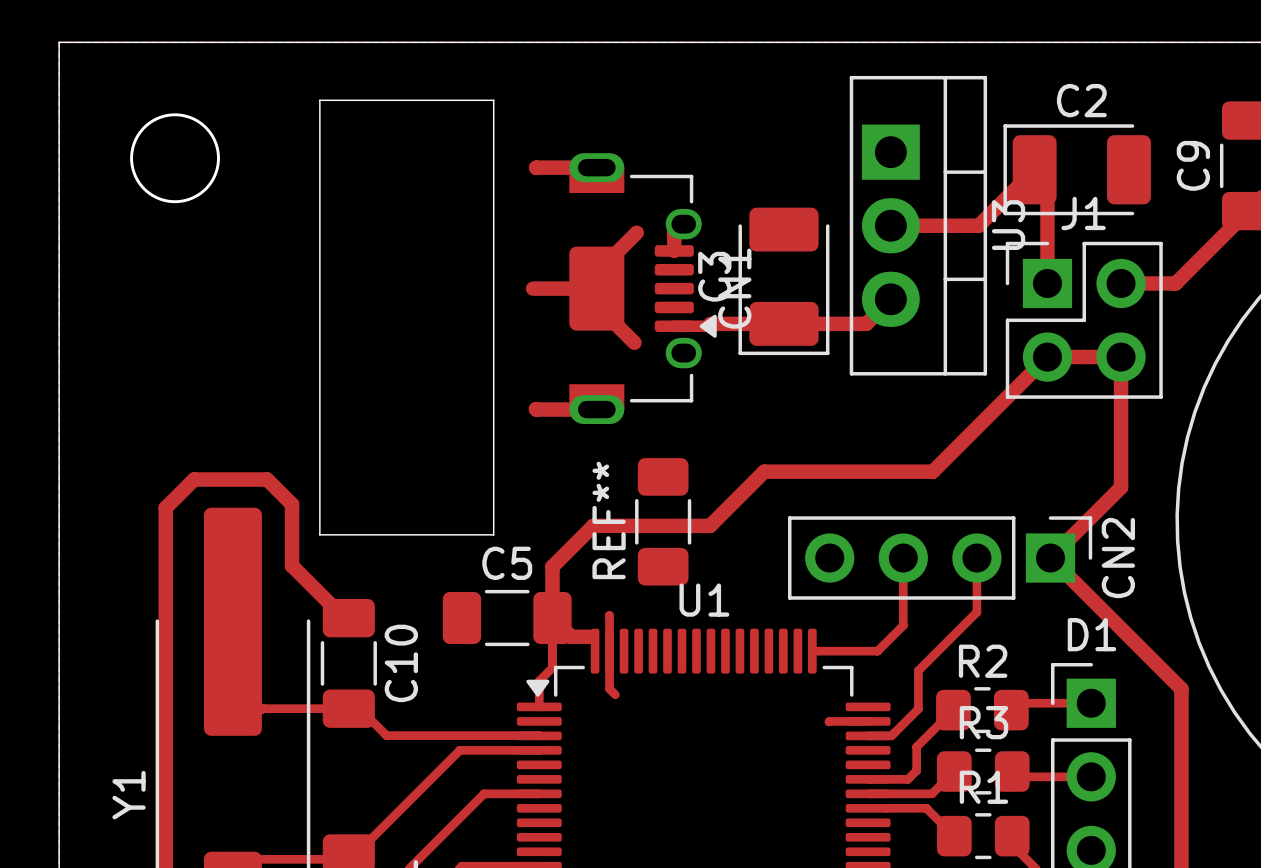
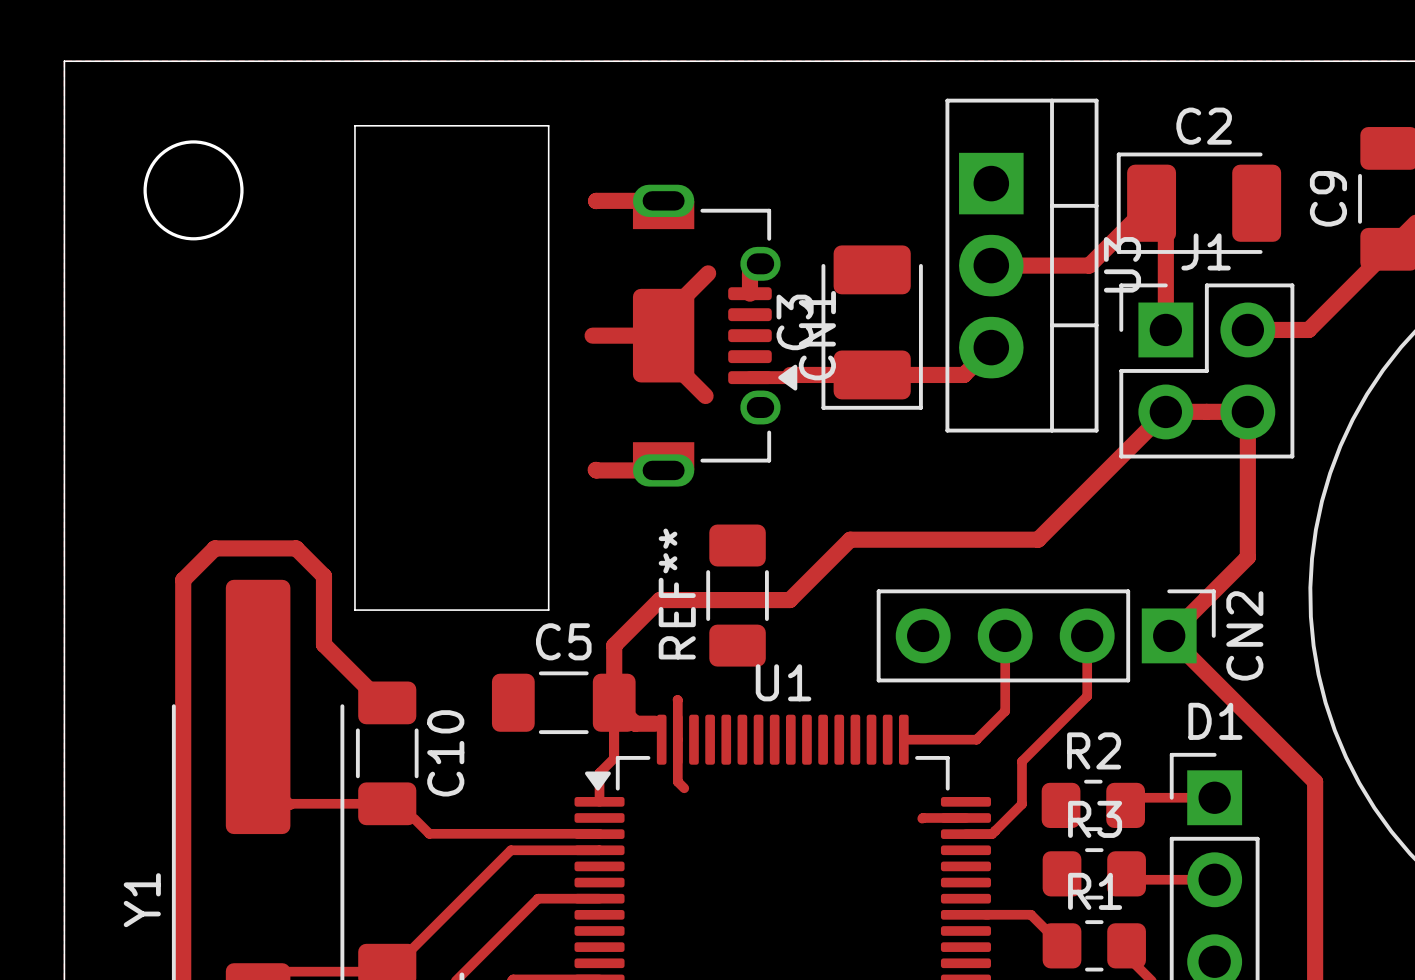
top track: (953, 710) (916, 746) (916, 770) (907, 779) (868, 779) -> none
top track: (954, 771) (932, 793) (868, 793) -> none

